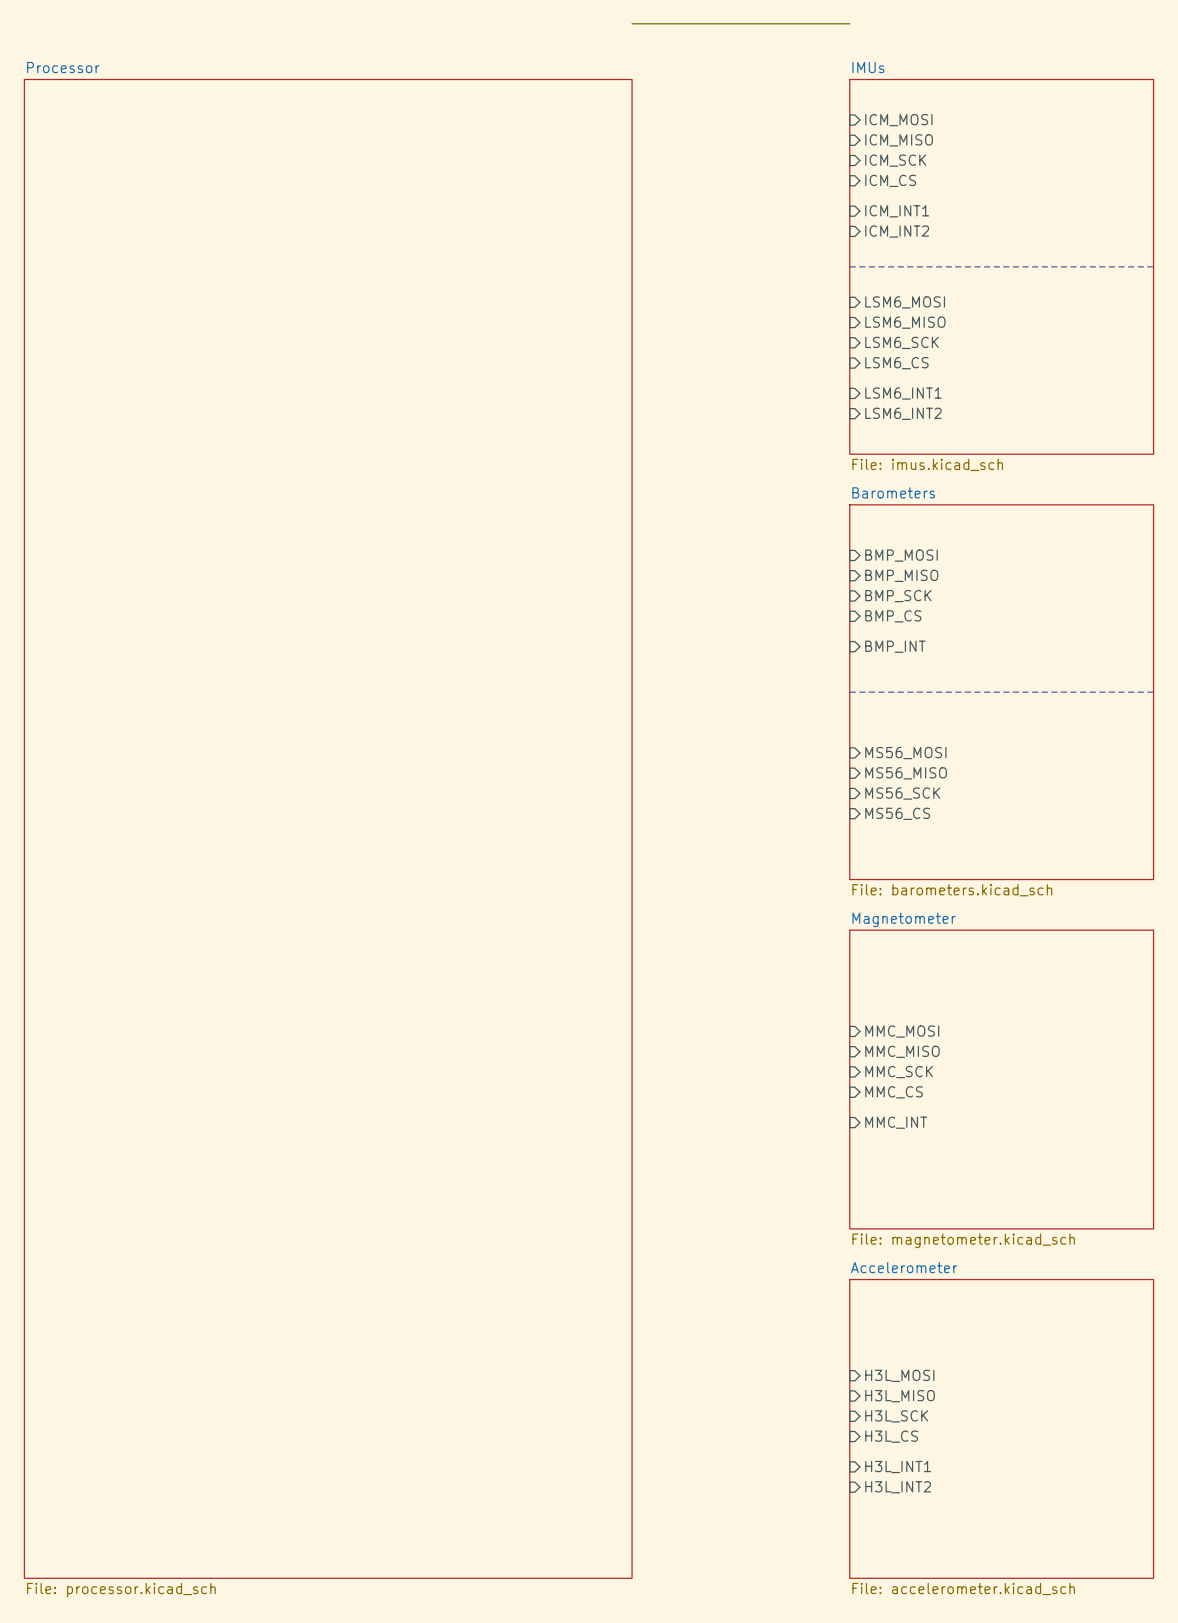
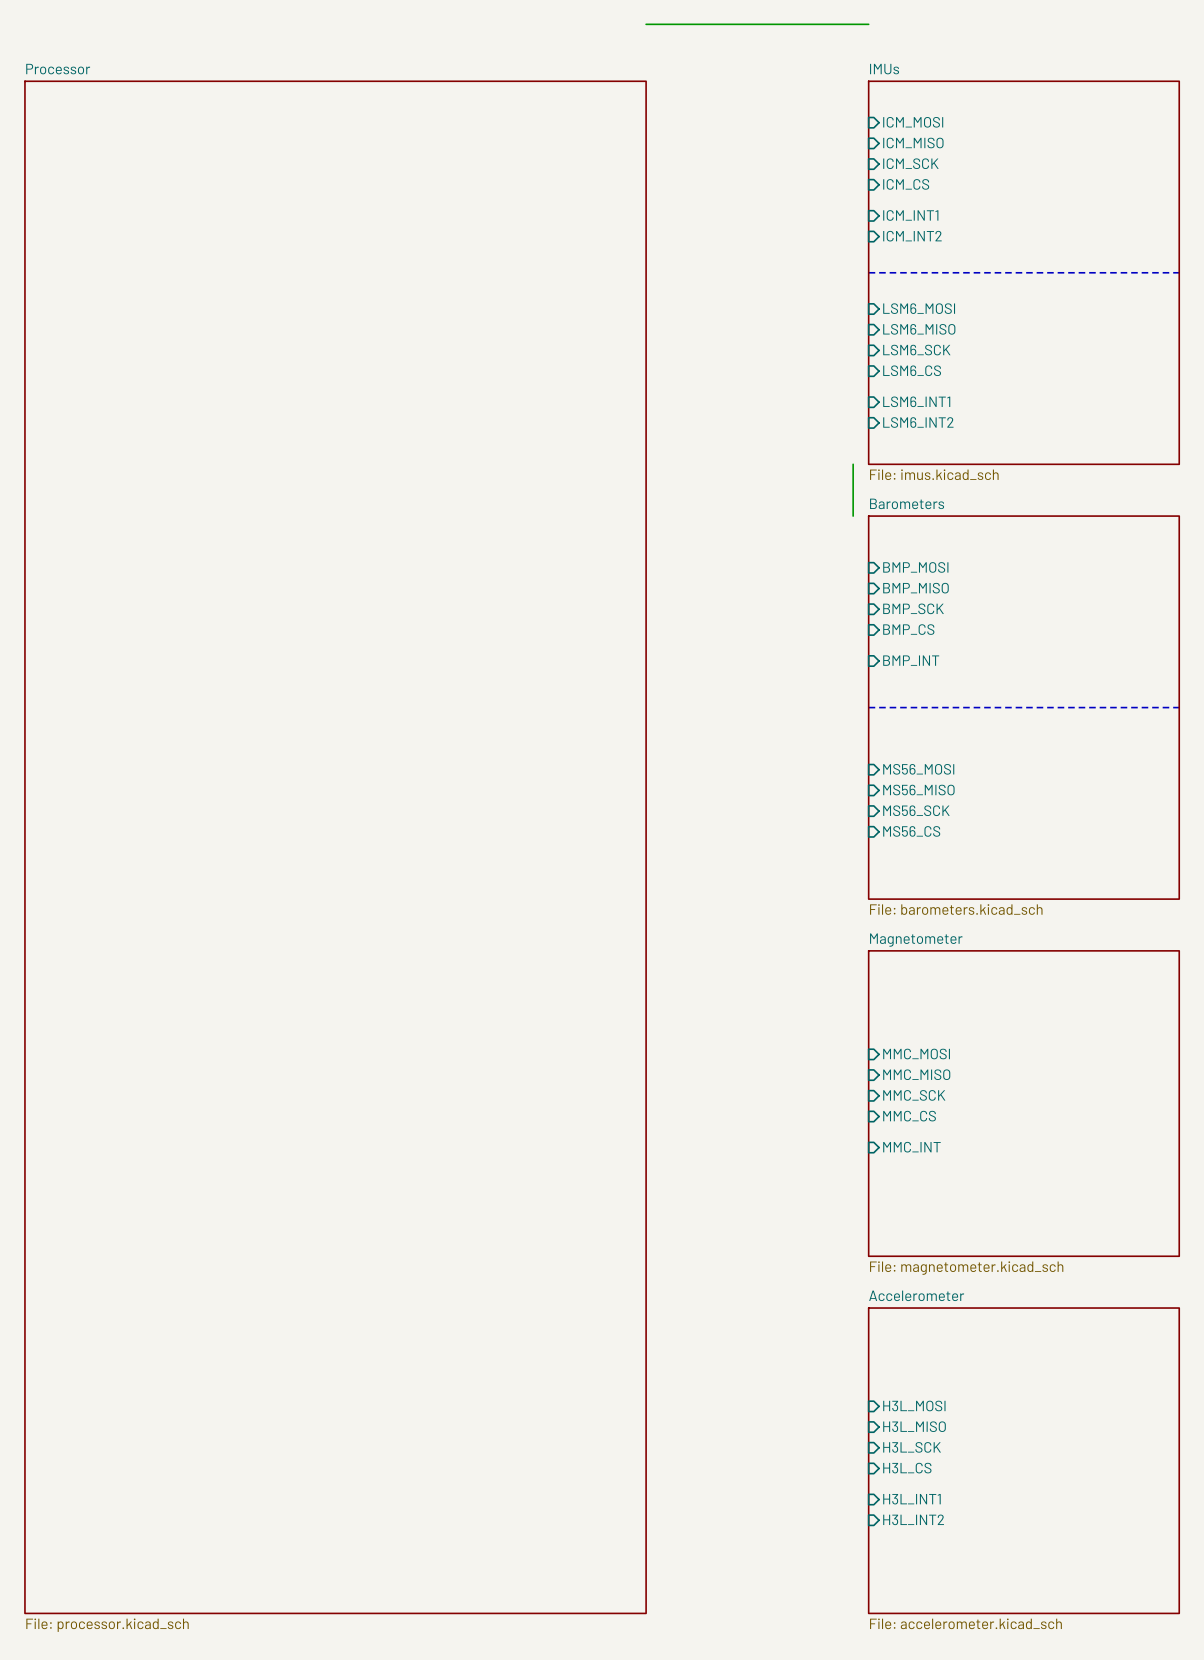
wire: none -> (853, 464) (853, 516)

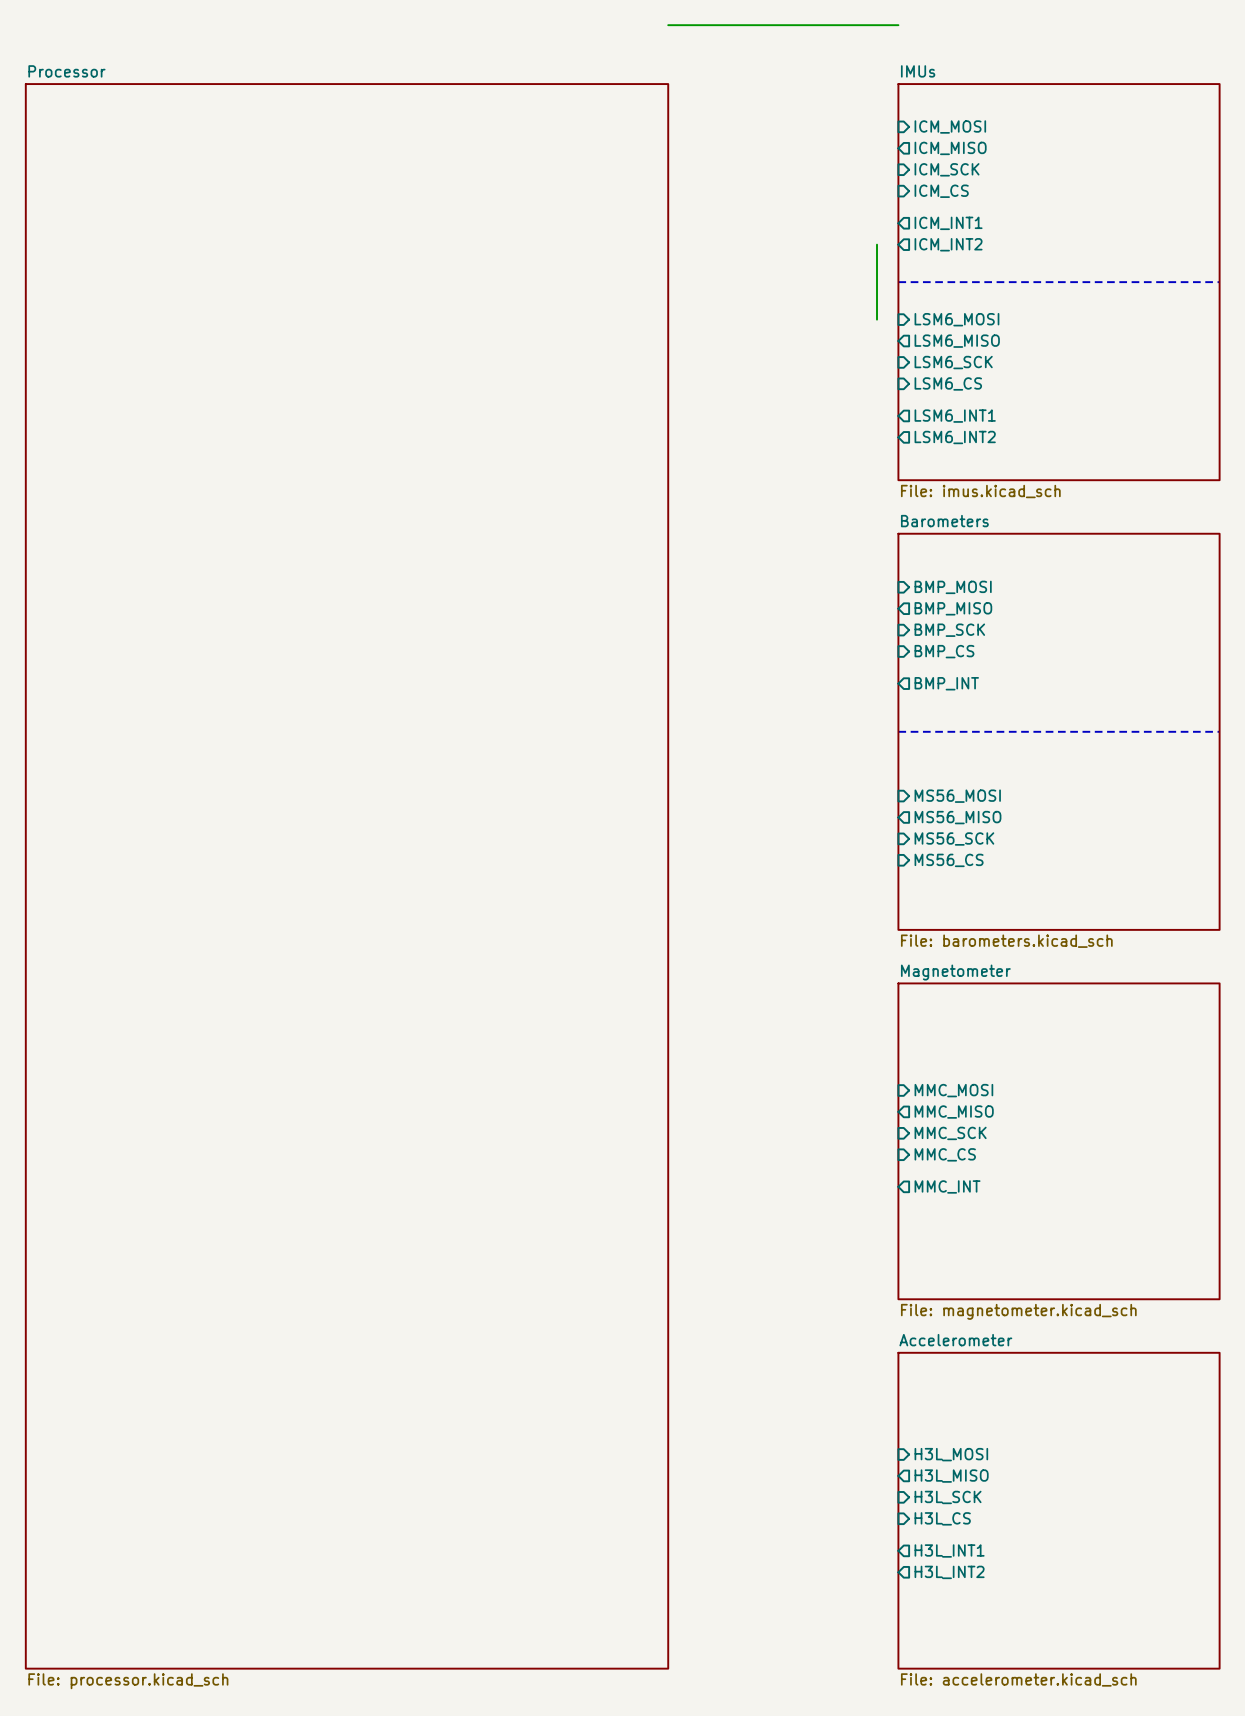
sheet pin shape: input (913, 143) -> output (950, 148)
sheet pin shape: input (910, 215) -> output (948, 223)
wire: none -> (877, 244) (877, 319)
sheet pin shape: input (912, 236) -> output (948, 244)
sheet pin shape: input (919, 329) -> output (957, 341)
sheet pin shape: input (916, 401) -> output (955, 416)
sheet pin shape: input (918, 422) -> output (955, 437)
wire: (853, 464) (853, 516) -> none
sheet pin shape: input (915, 588) -> output (953, 608)
sheet pin shape: input (911, 660) -> output (946, 683)
sheet pin shape: input (918, 790) -> output (957, 817)
sheet pin shape: input (916, 1074) -> output (954, 1112)
sheet pin shape: input (911, 1147) -> output (947, 1186)
sheet pin shape: input (914, 1426) -> output (951, 1476)
sheet pin shape: input (911, 1499) -> output (949, 1550)
sheet pin shape: input (913, 1519) -> output (949, 1572)

